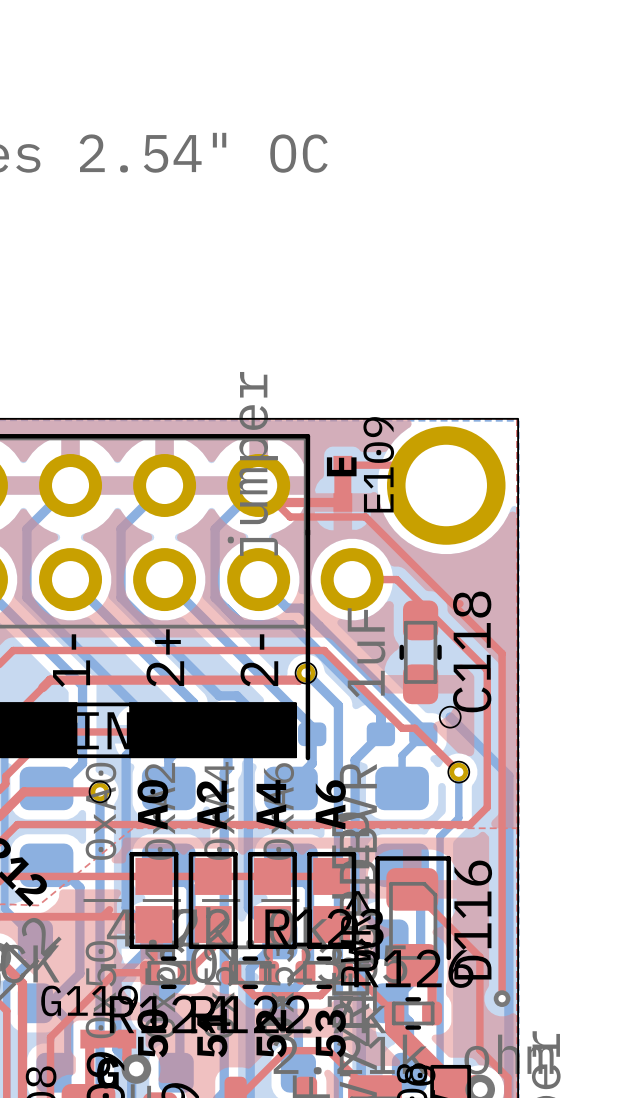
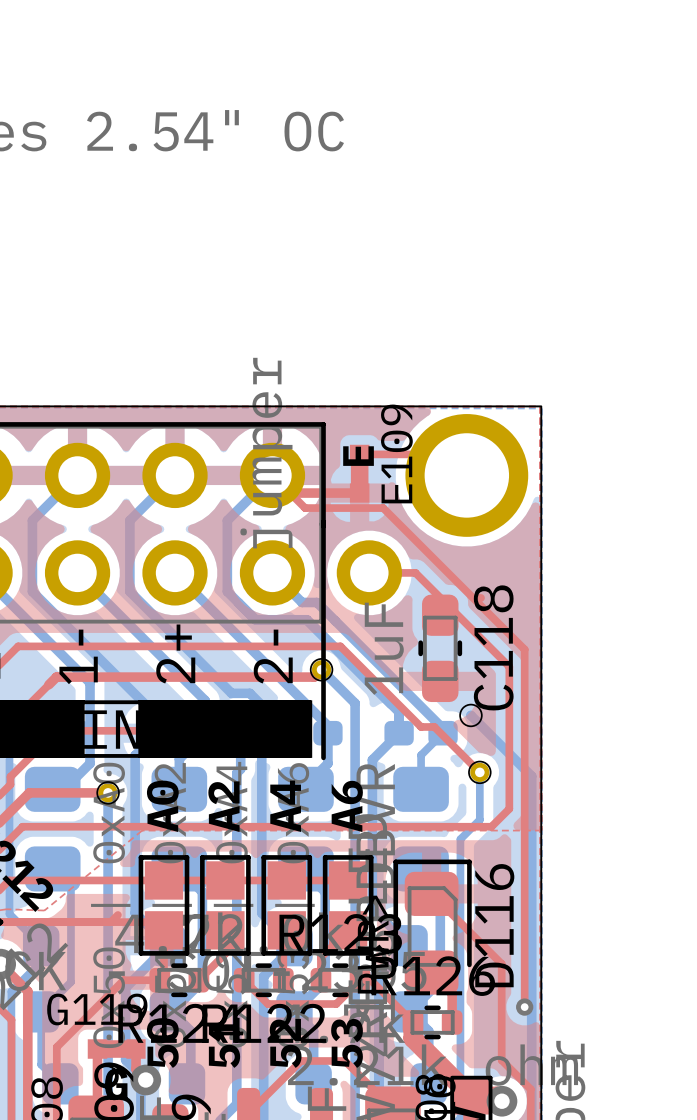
bottom track: none -> (52, 868) (70, 887) (70, 982) (41, 1011) (41, 1064) (60, 1083)
bottom track: (57, 865) (79, 887) (79, 973) (50, 1003) (68, 1021) (68, 1072) -> none

